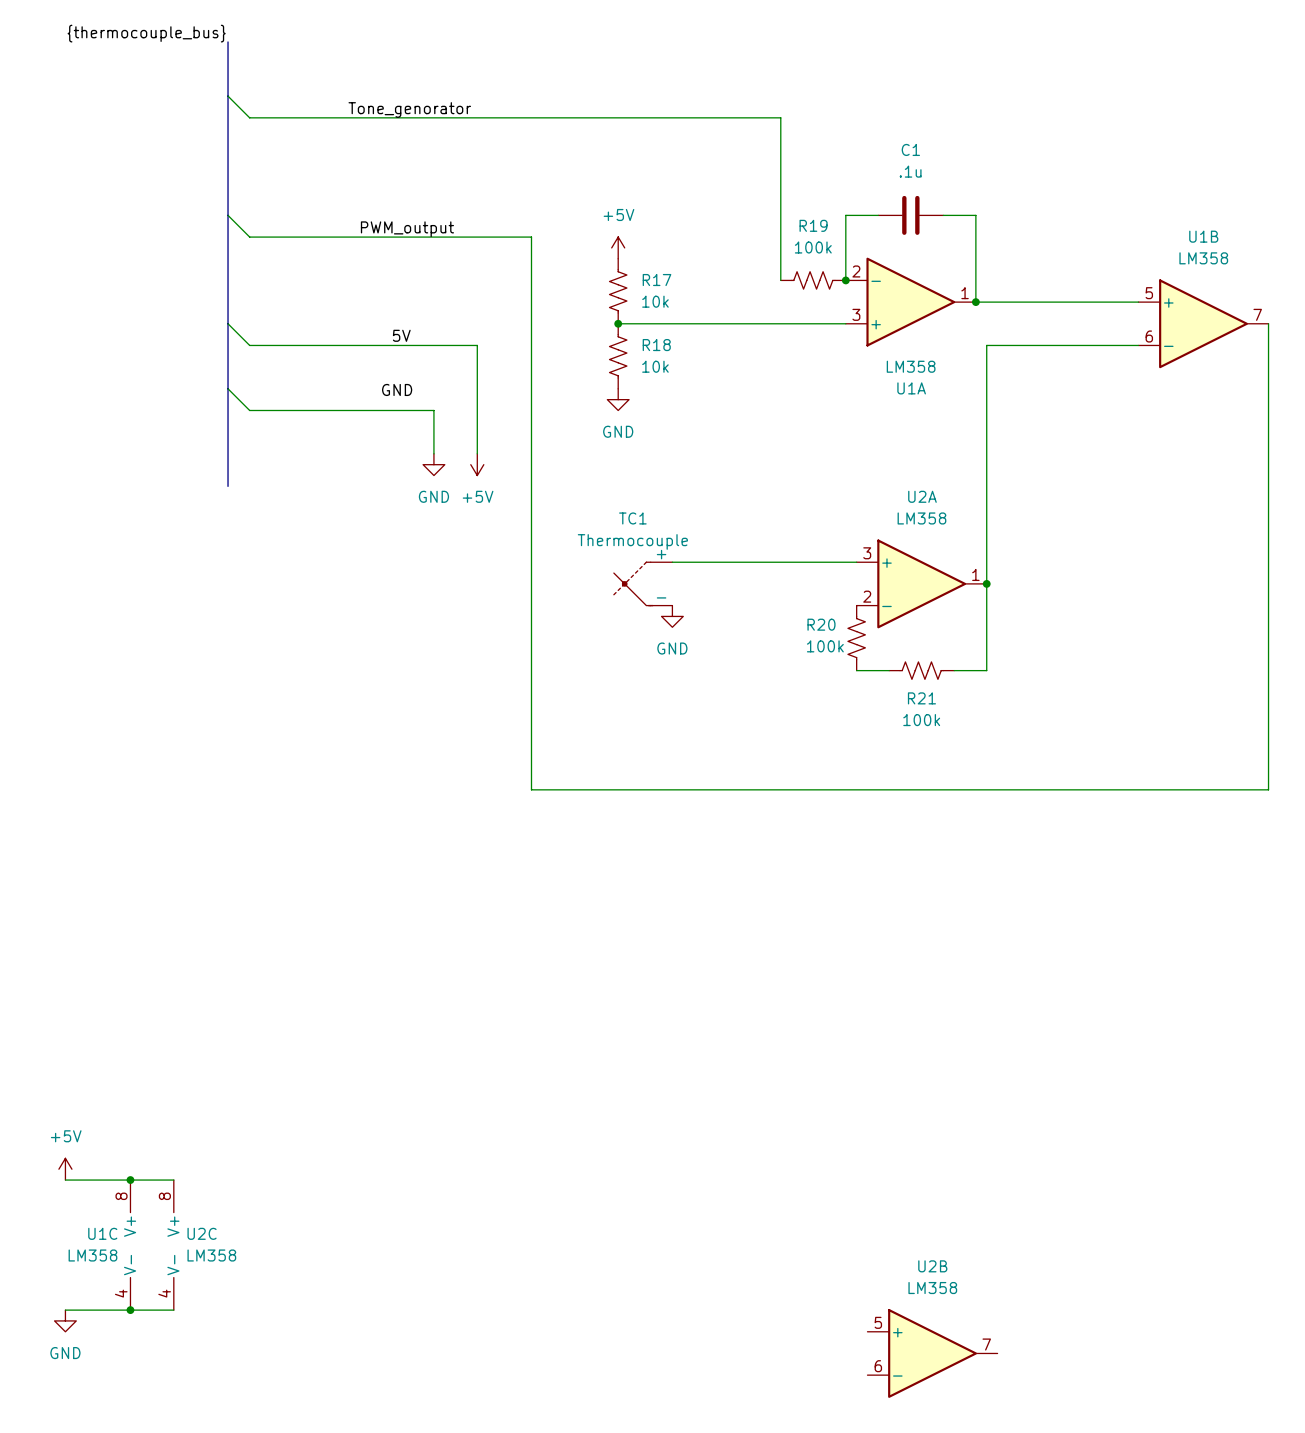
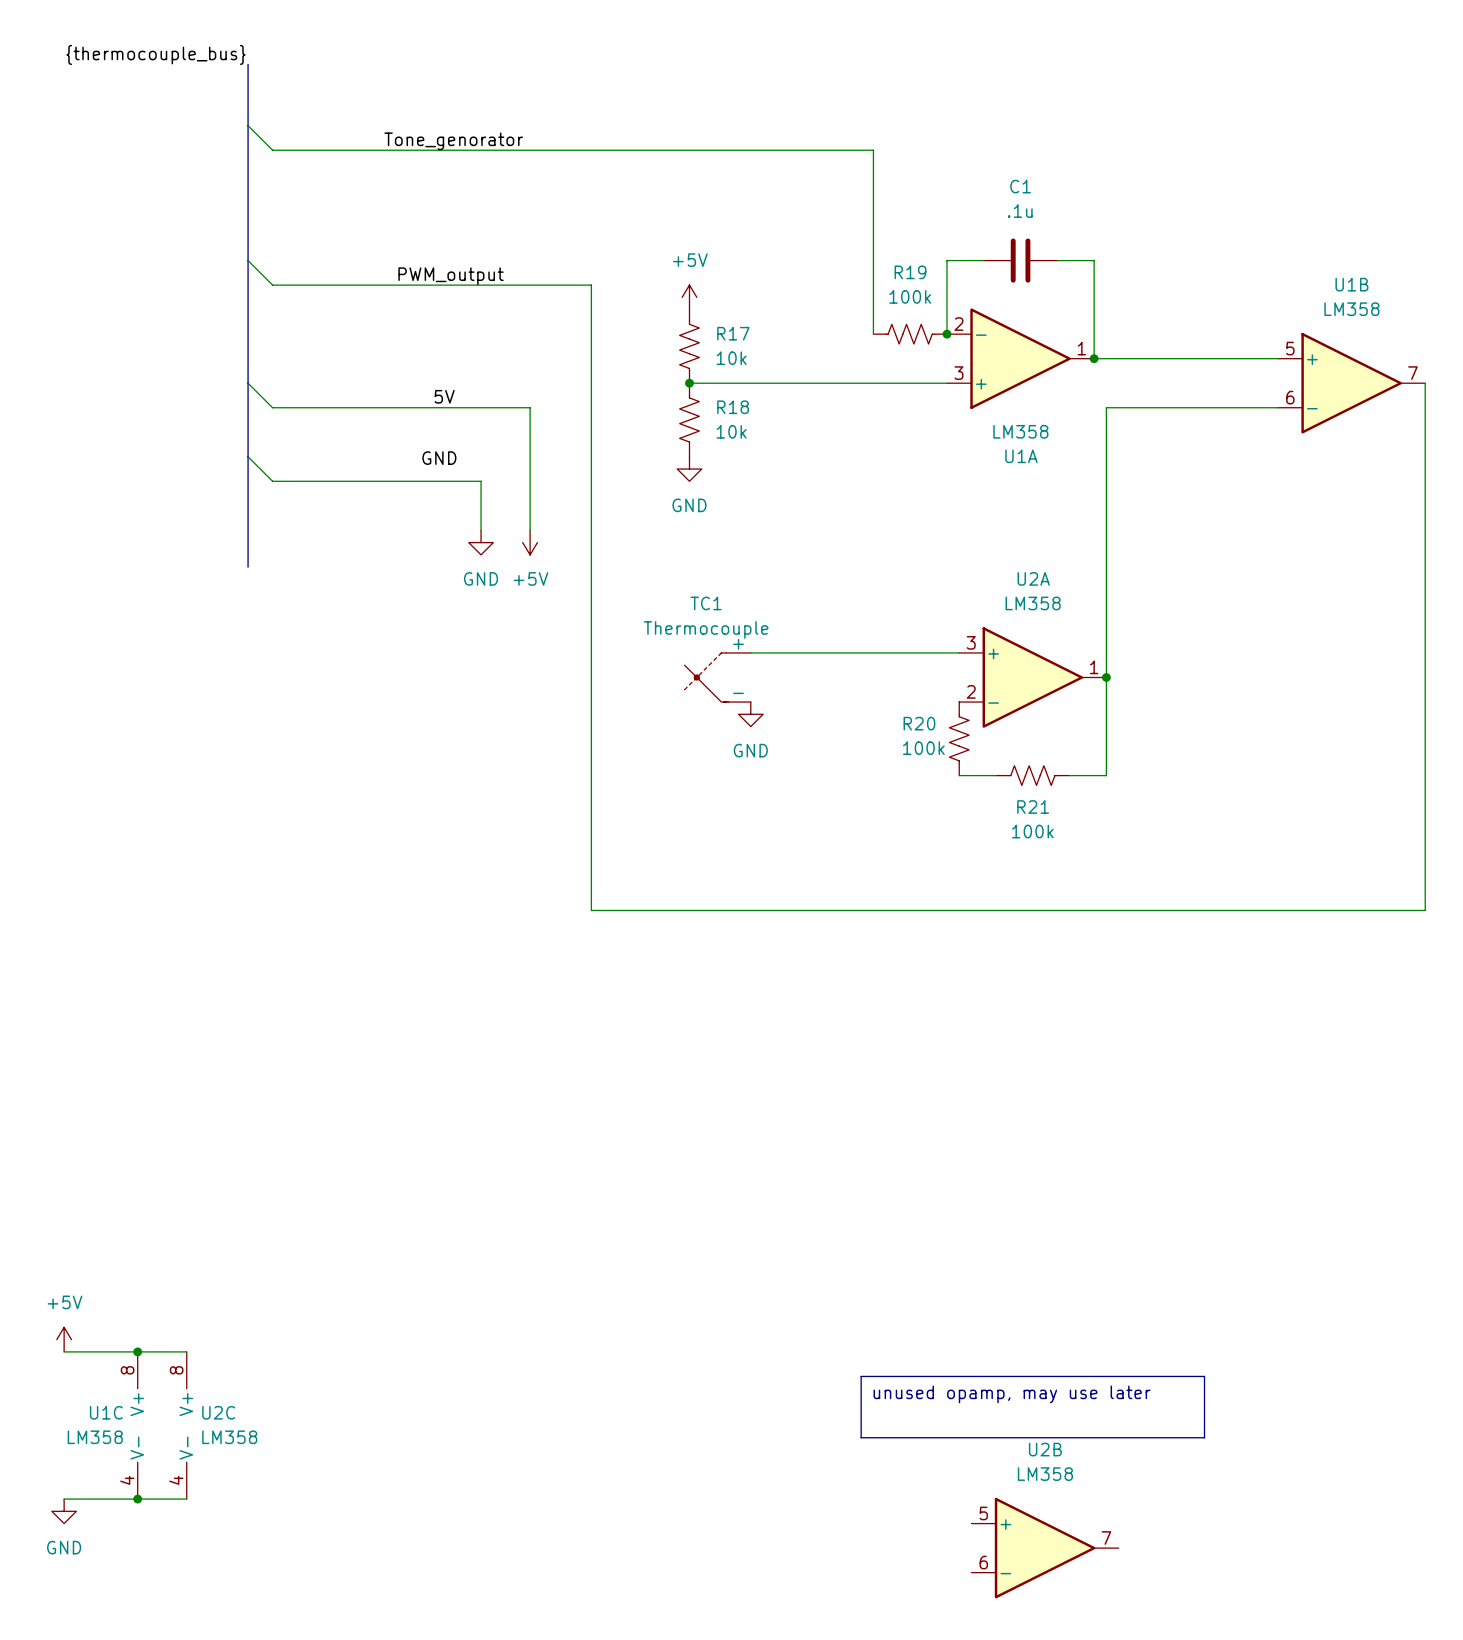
line: none -> (861, 1376) (1204, 1376) (1204, 1437) (861, 1437) (861, 1376)
text: none -> unused opamp, may use later (1012, 1394)

